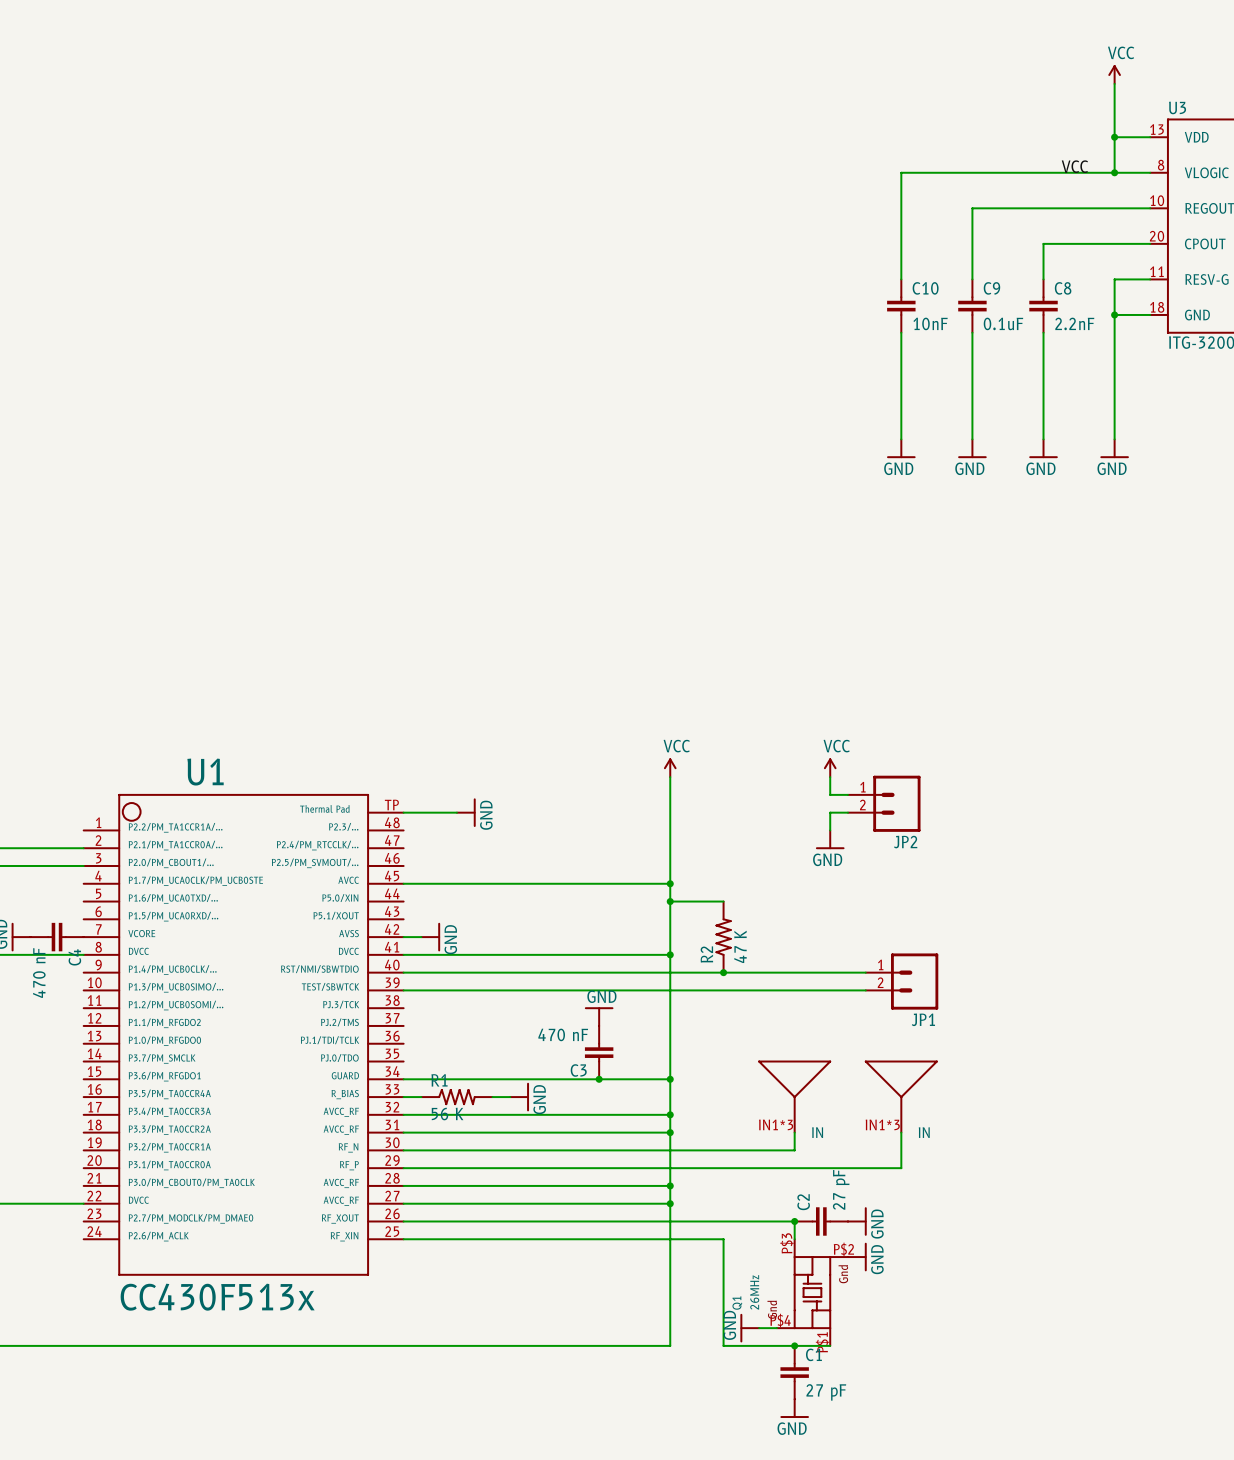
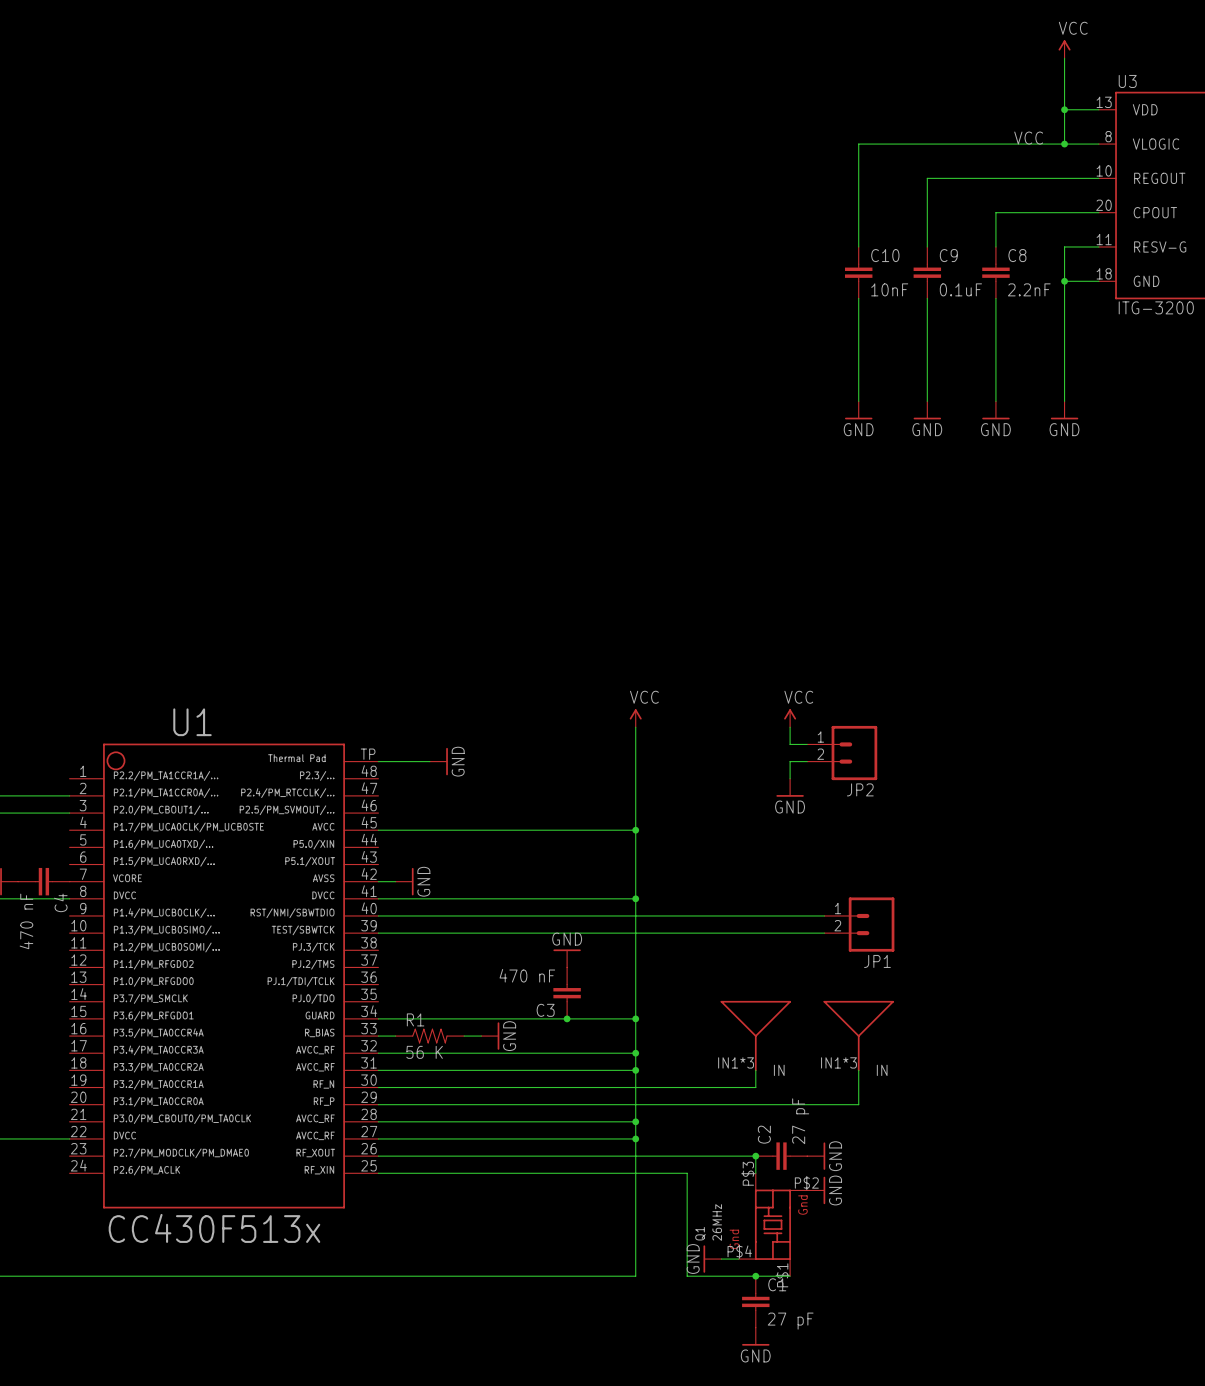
wire: (670, 901) (723, 901) -> none
junction: (670, 901) -> none
R2: 47 K (723, 937) -> none
junction: (723, 972) -> none

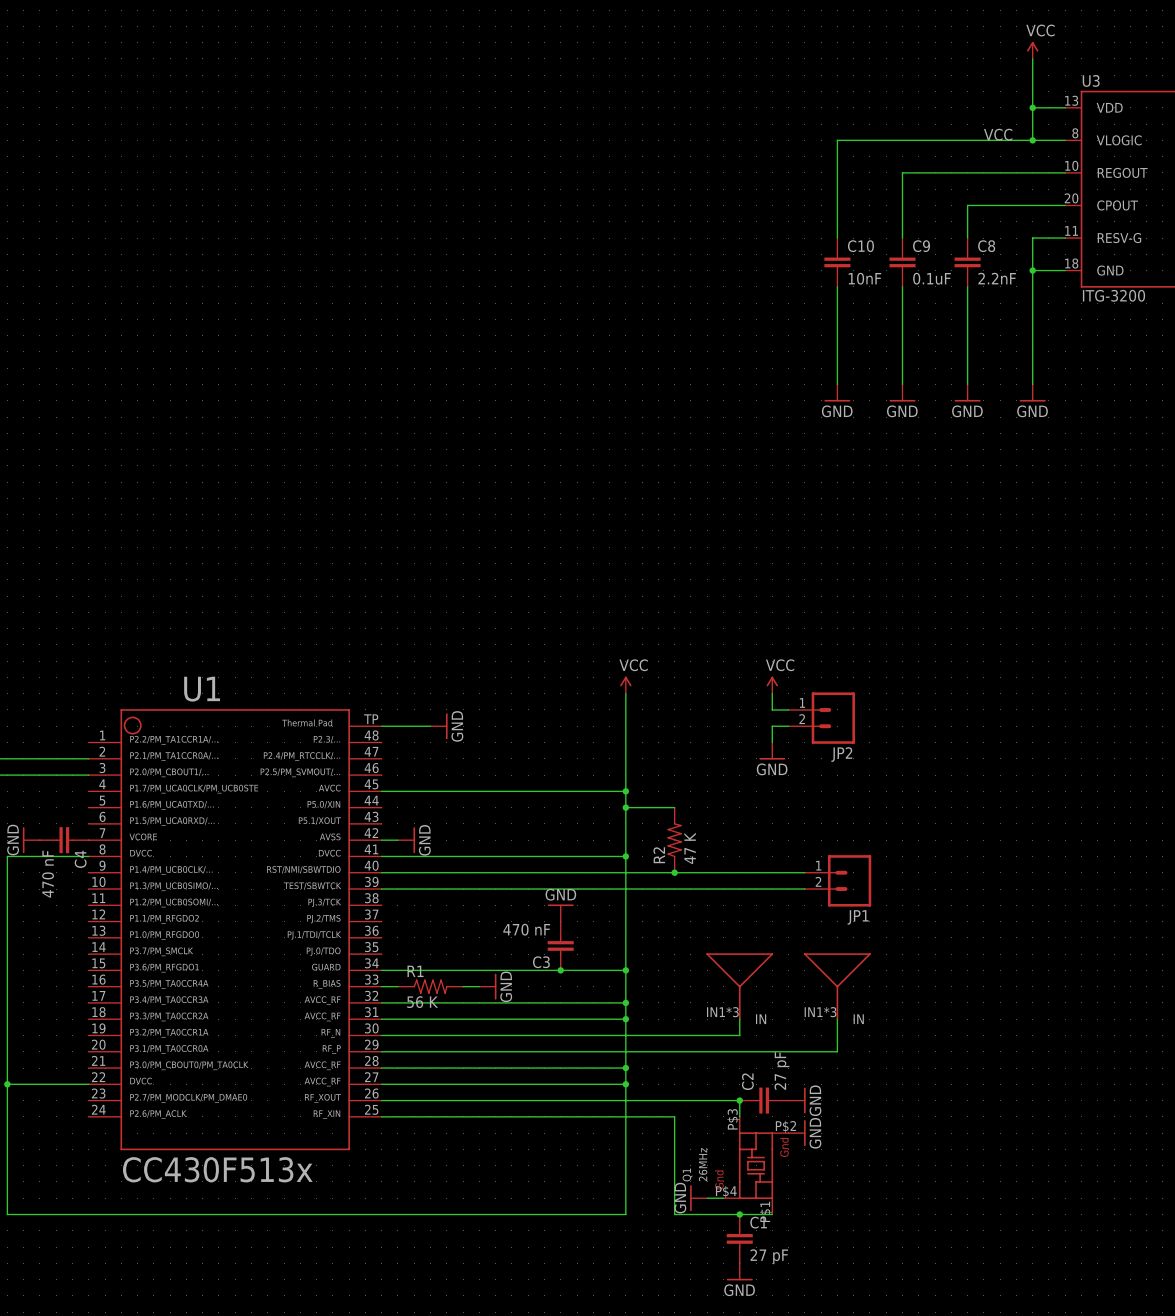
wire: none -> (625, 807) (674, 807)
junction: none -> (625, 807)
R2: none -> 47 K (674, 840)
junction: none -> (674, 872)

